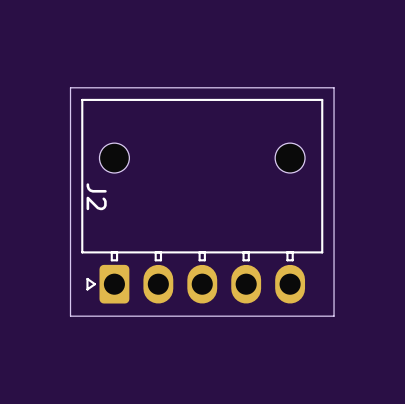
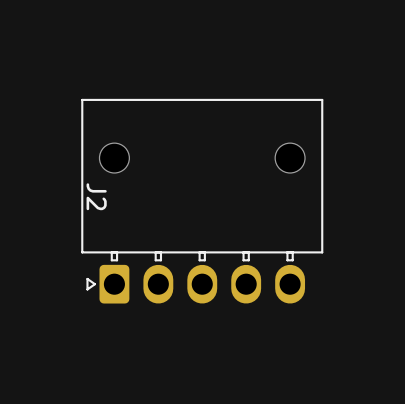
board edge: (334, 87) (334, 316) (70, 316) (70, 87) (334, 87) -> none

